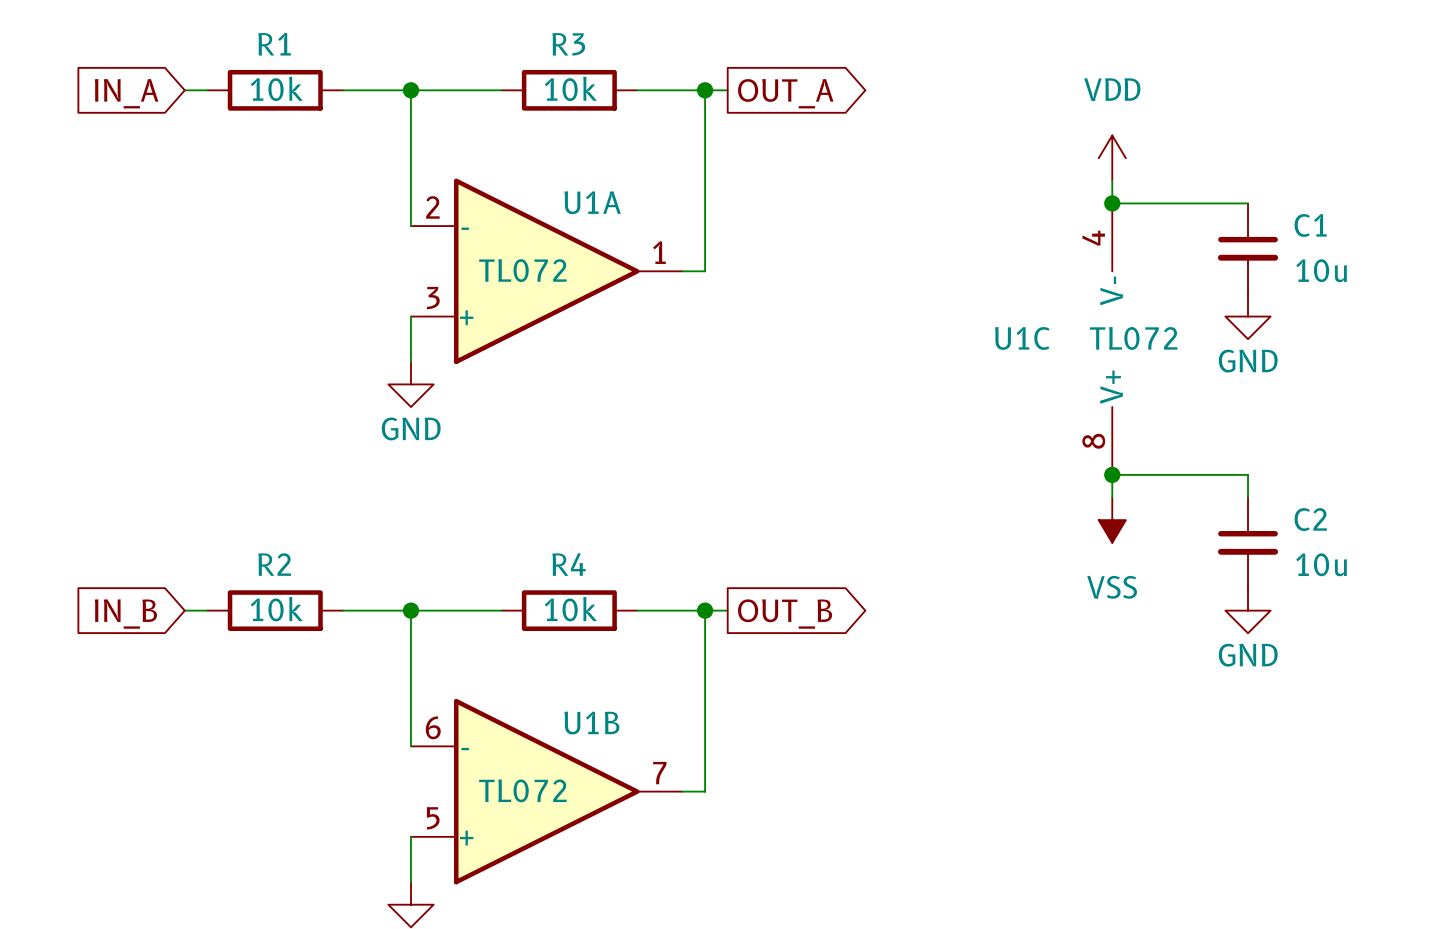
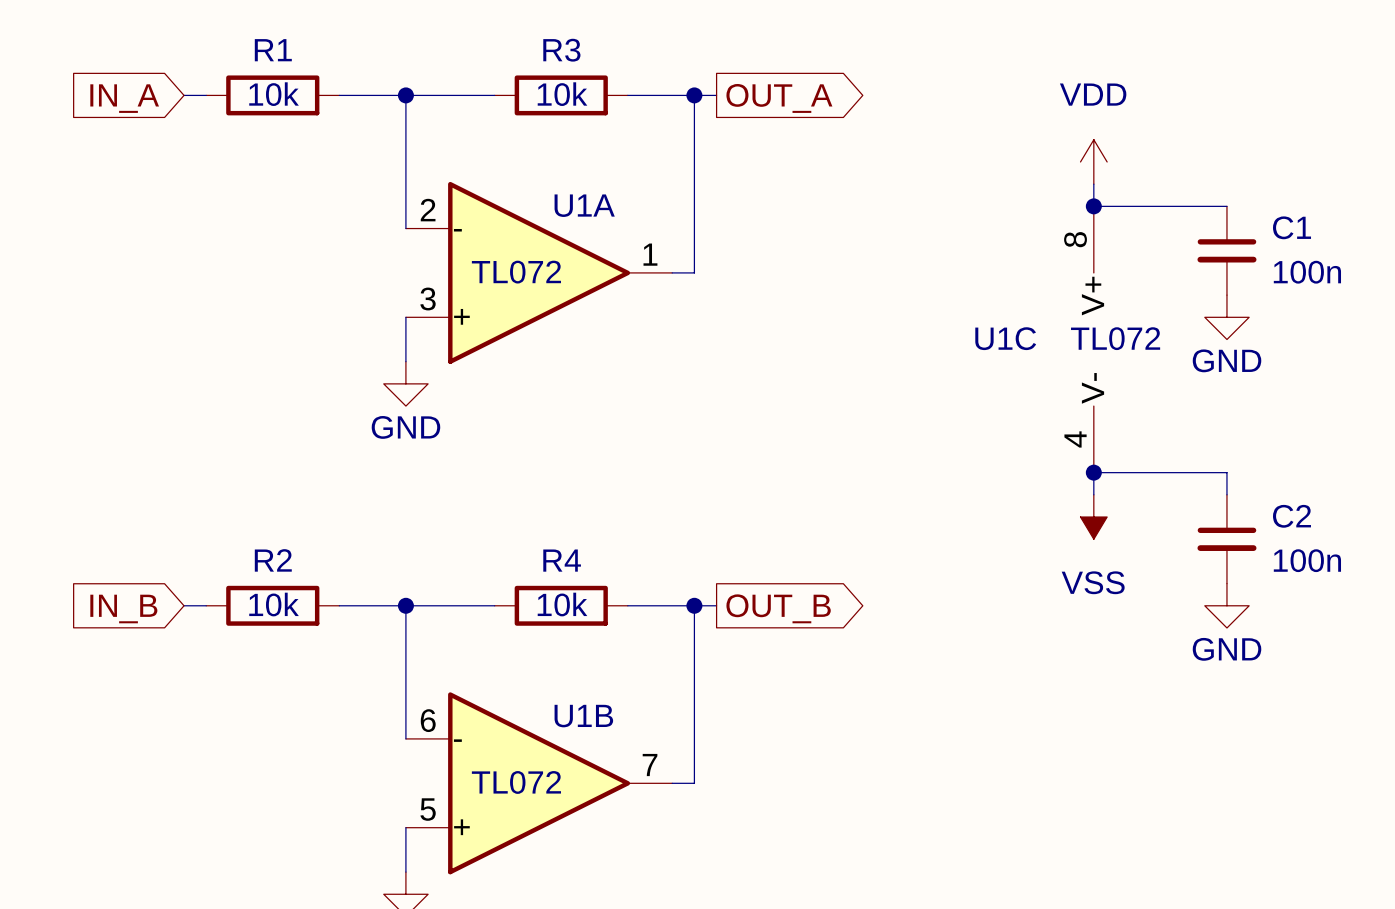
C1 value: 10u (1321, 270) -> 100n (1307, 272)
U1C rotation: 0° (1112, 339) -> 180° (1093, 339)
C2 value: 10u (1321, 564) -> 100n (1307, 560)

